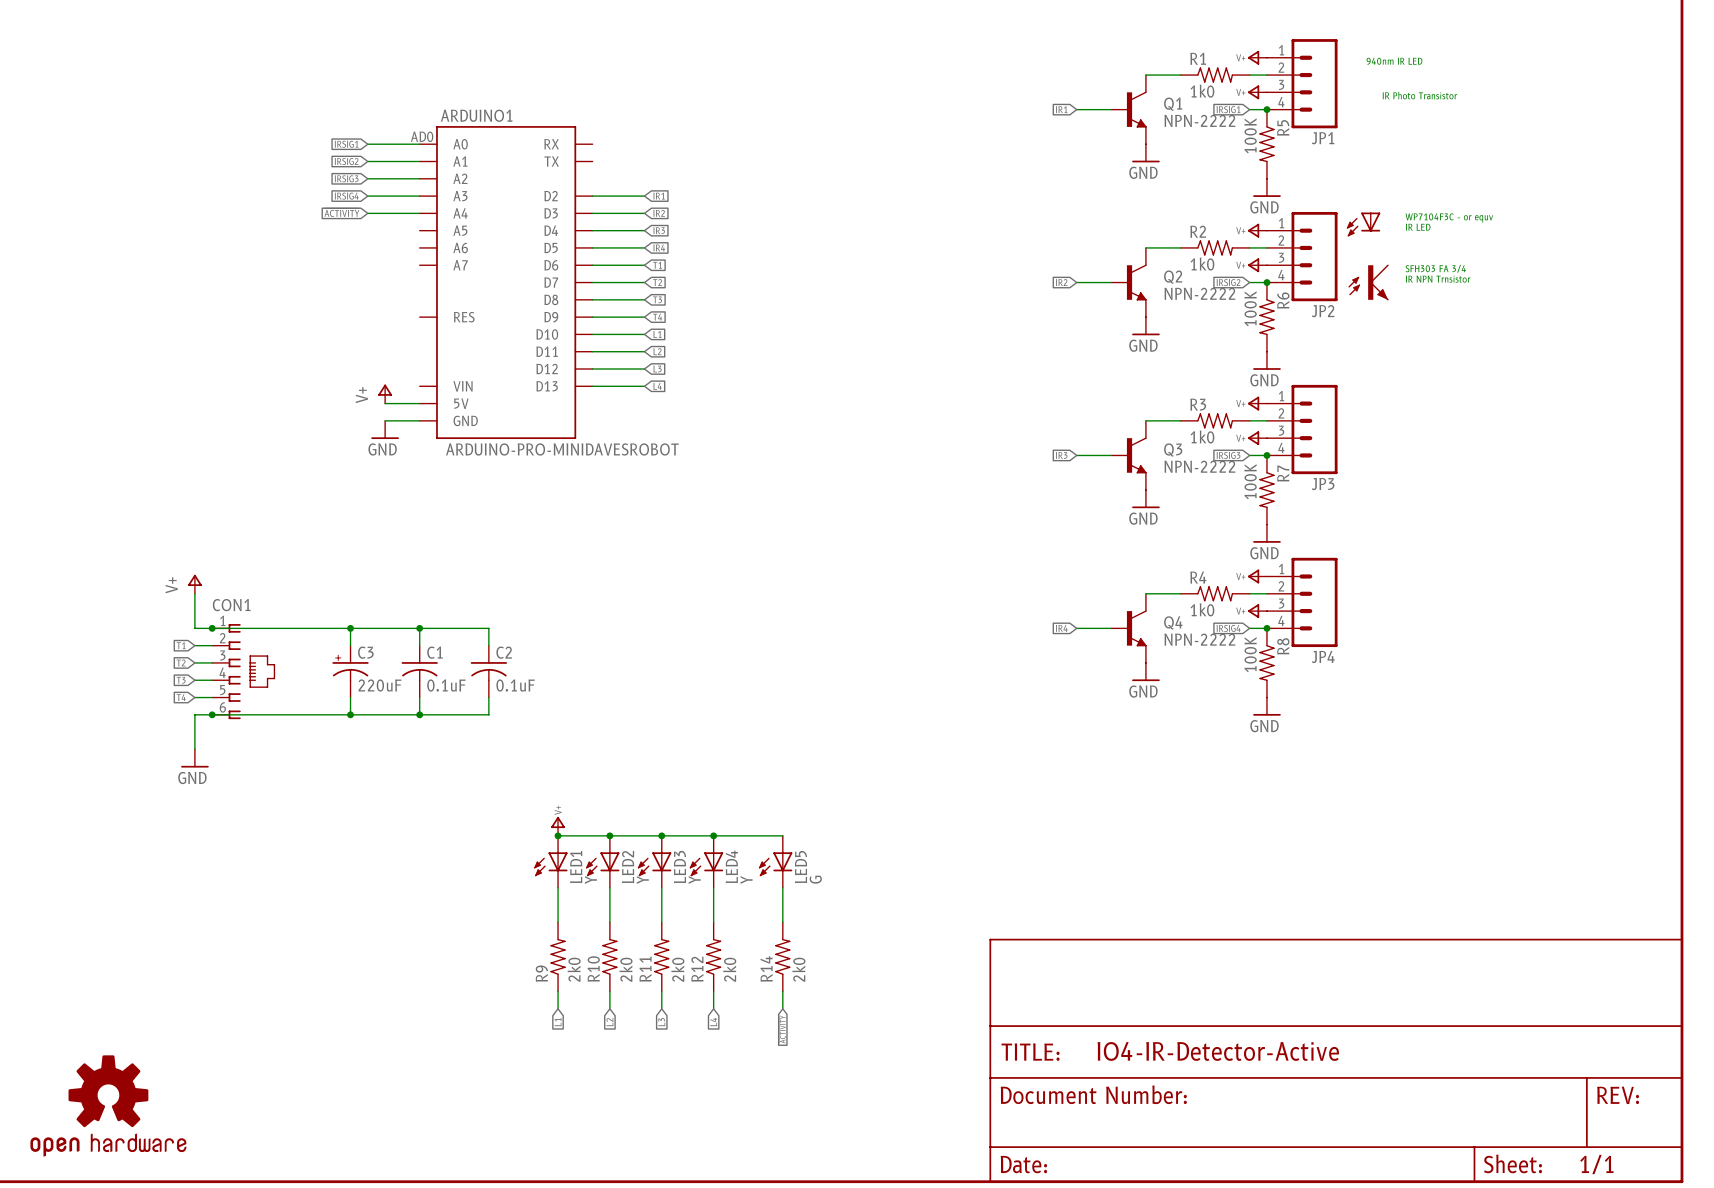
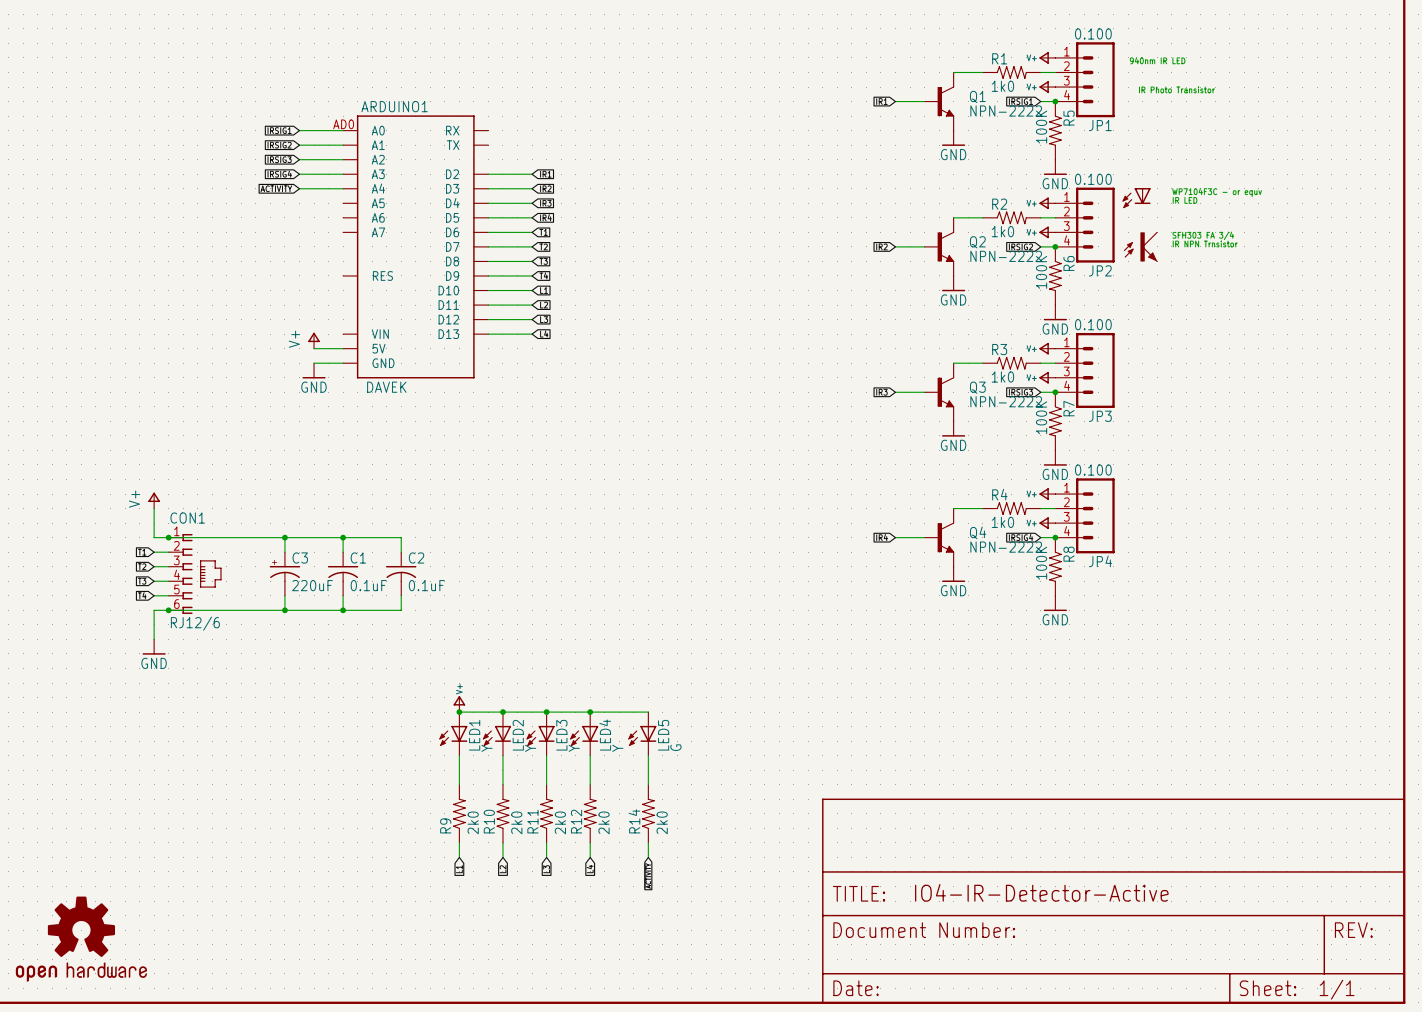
JP1 value: none -> 0.100 (1093, 33)
JP2 value: none -> 0.100 (1093, 179)
JP3 value: none -> 0.100 (1093, 324)
ARDUINO1 value: ARDUINO-PRO-MINIDAVESROBOT (562, 449) -> DAVEK (386, 387)
JP4 value: none -> 0.100 (1093, 470)
CON1 value: none -> RJ12/6 (195, 623)

